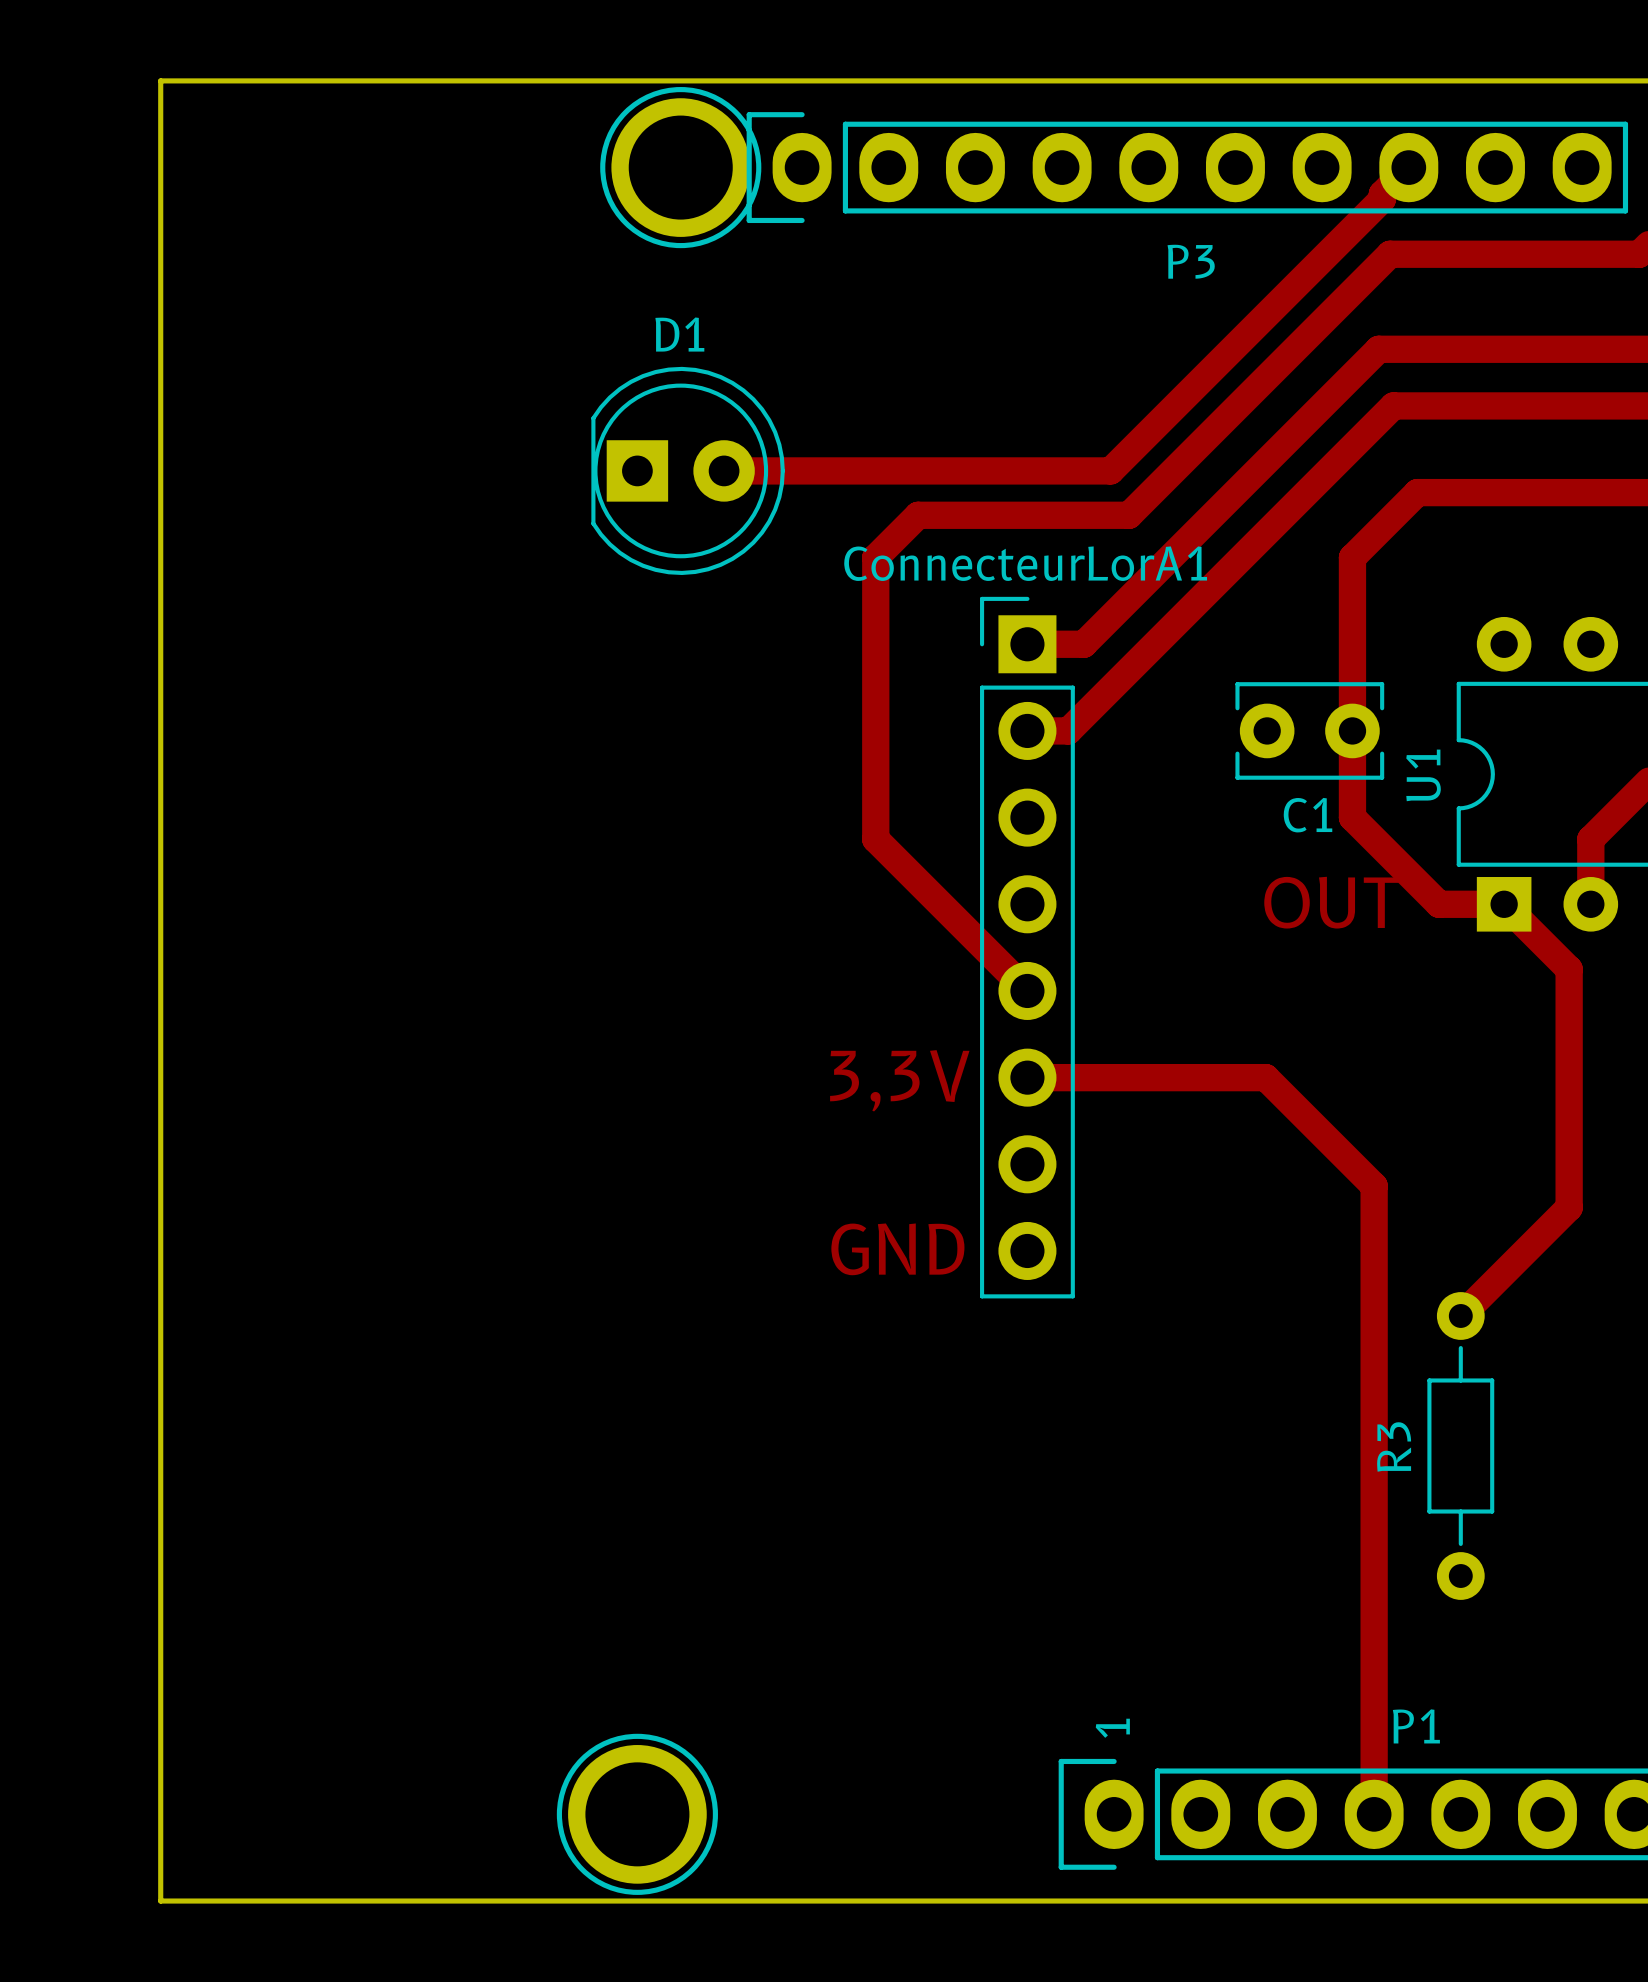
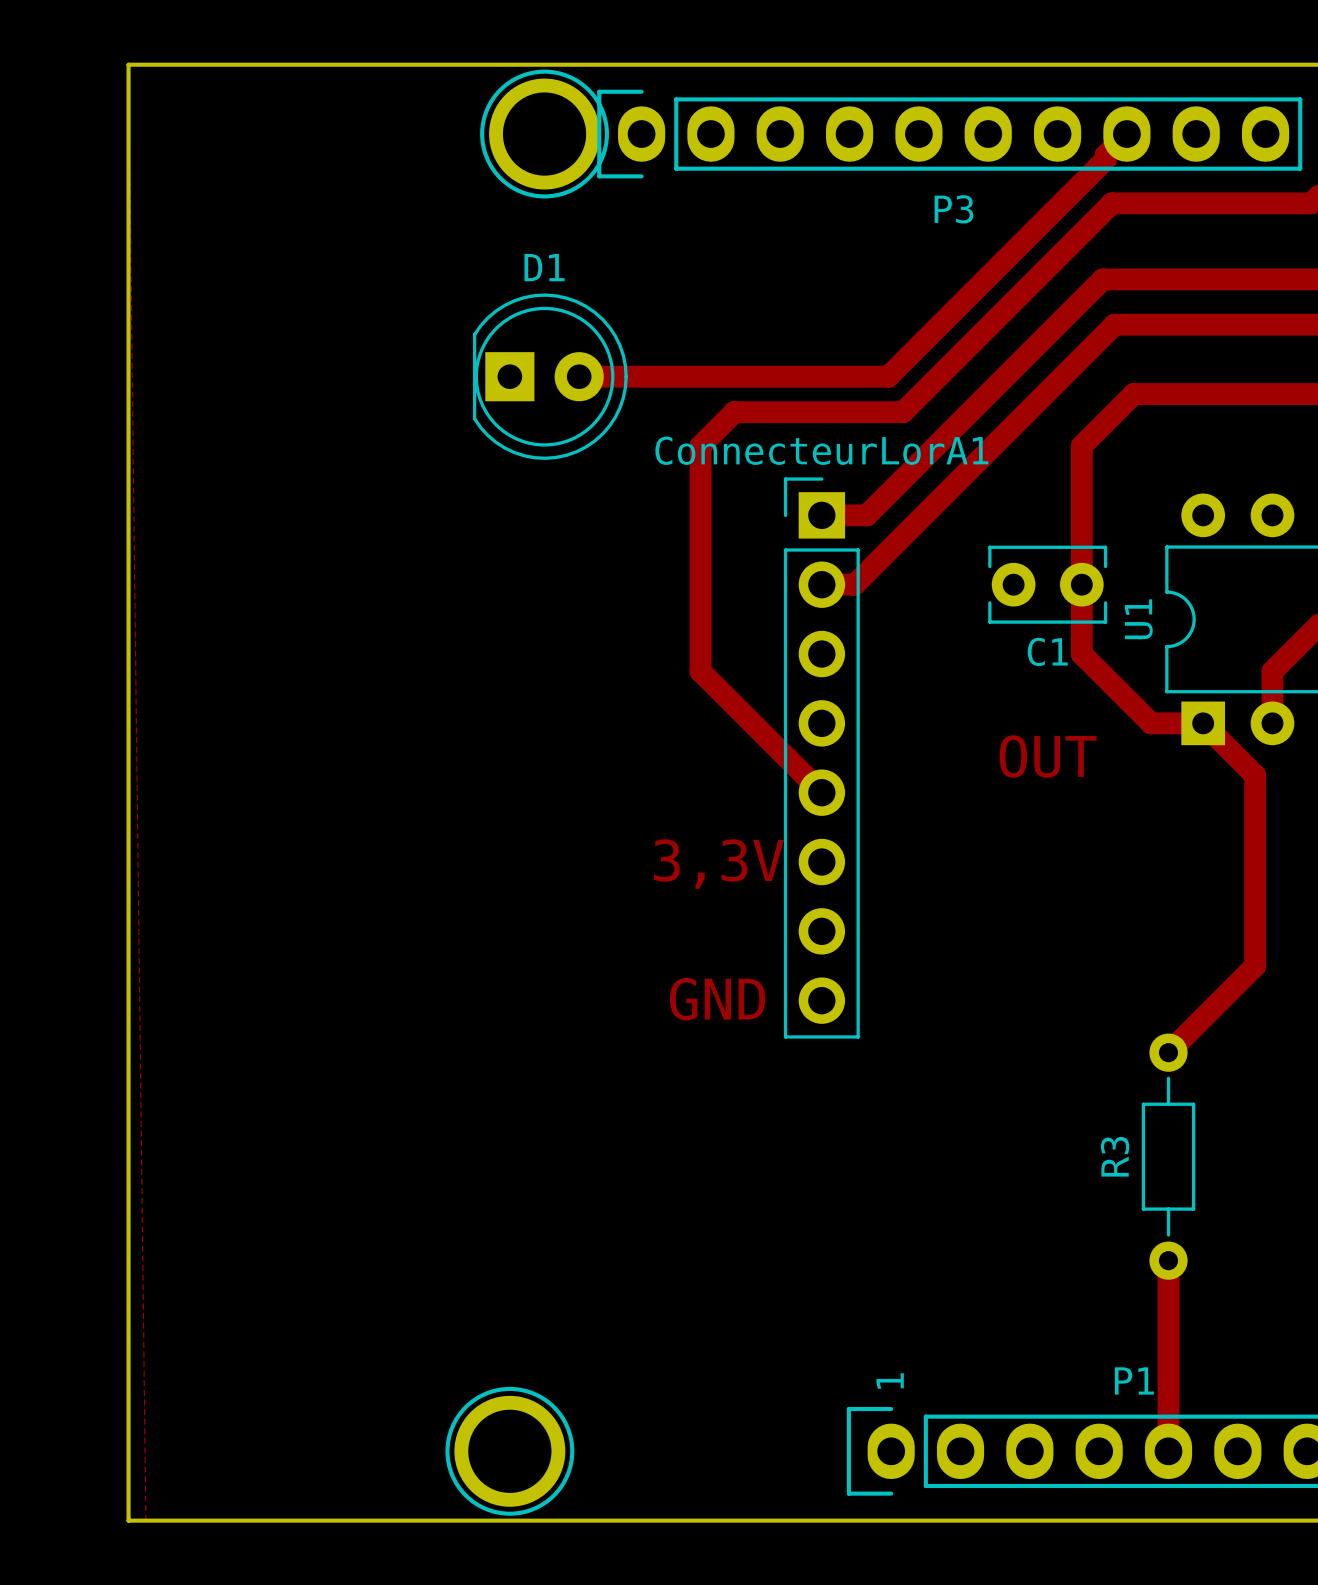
zone outline: none -> (128, 64) (145, 1520)
text position: OUT (1331, 902) -> OUT (1048, 756)
track: (1027, 1077) (1265, 1077) (1374, 1185) (1374, 1814) -> none
track: none -> (1168, 1260) (1168, 1451)

